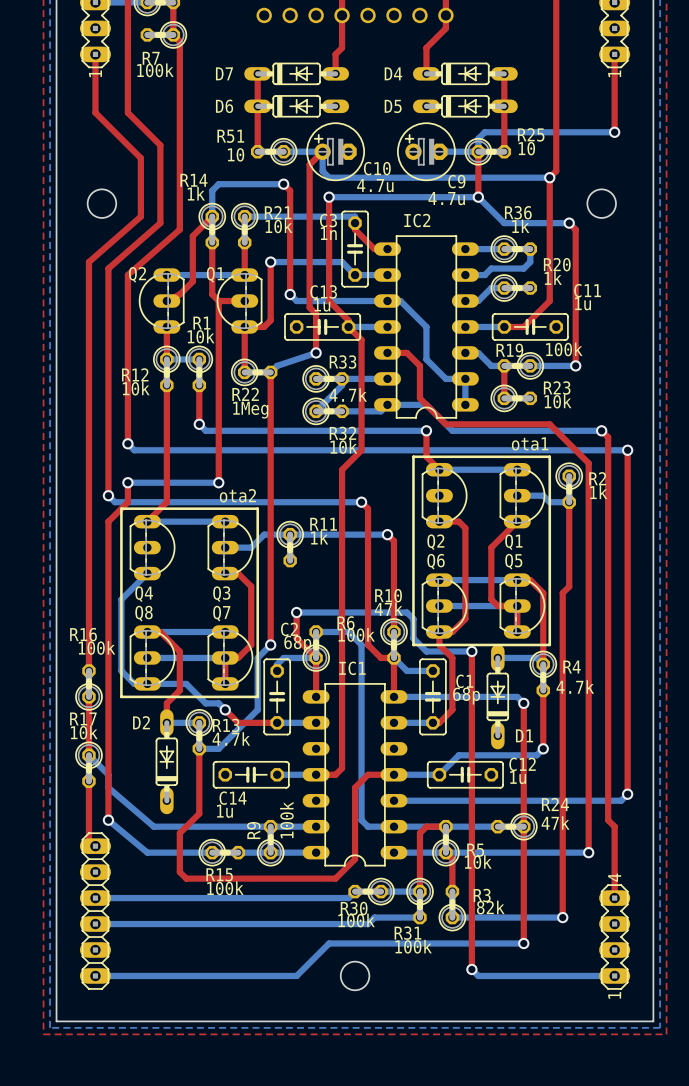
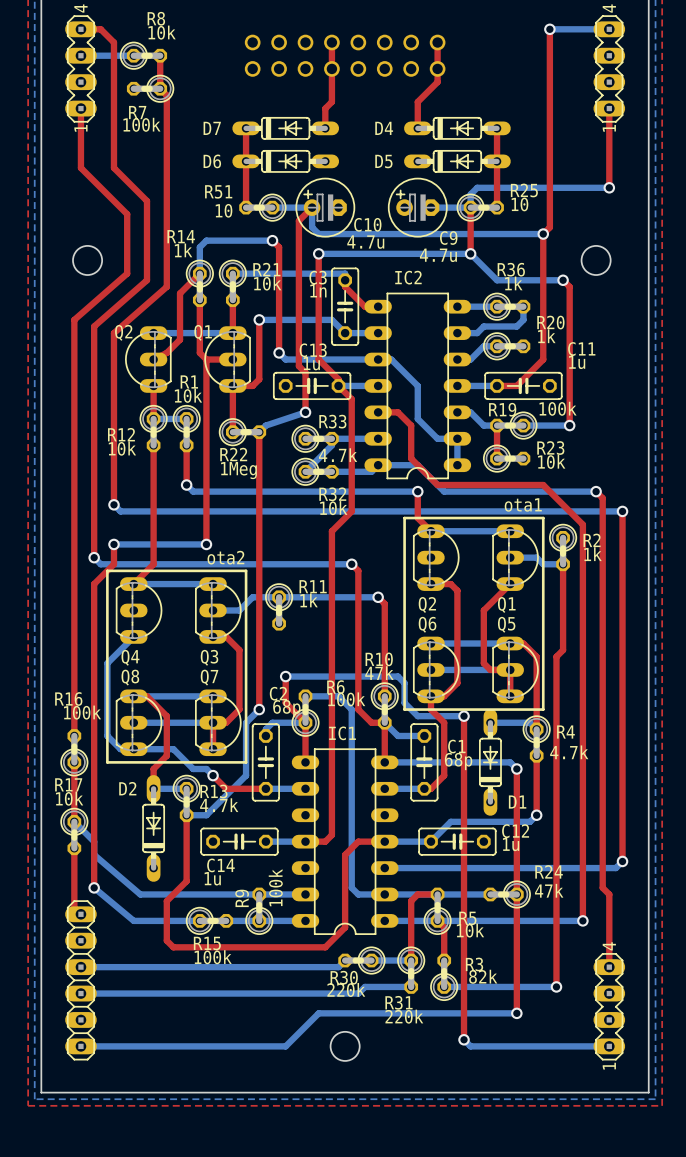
R30 value: 100k (356, 920) -> 220k (346, 989)
R31 value: 100k (413, 946) -> 220k (404, 1016)

